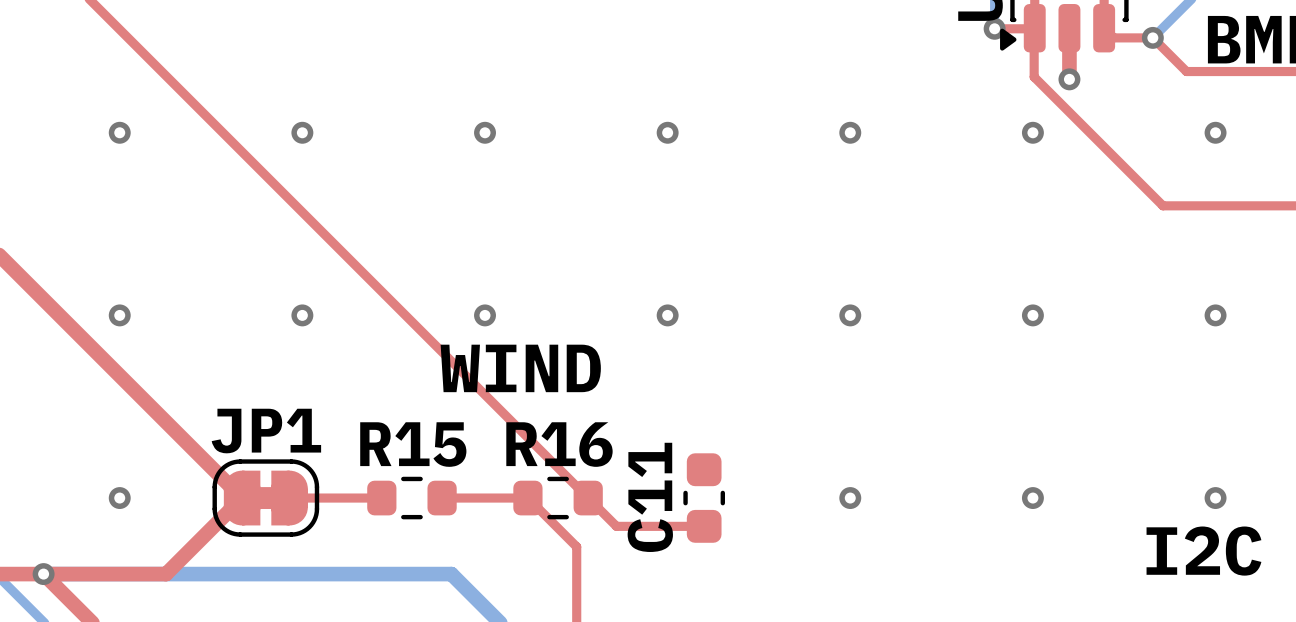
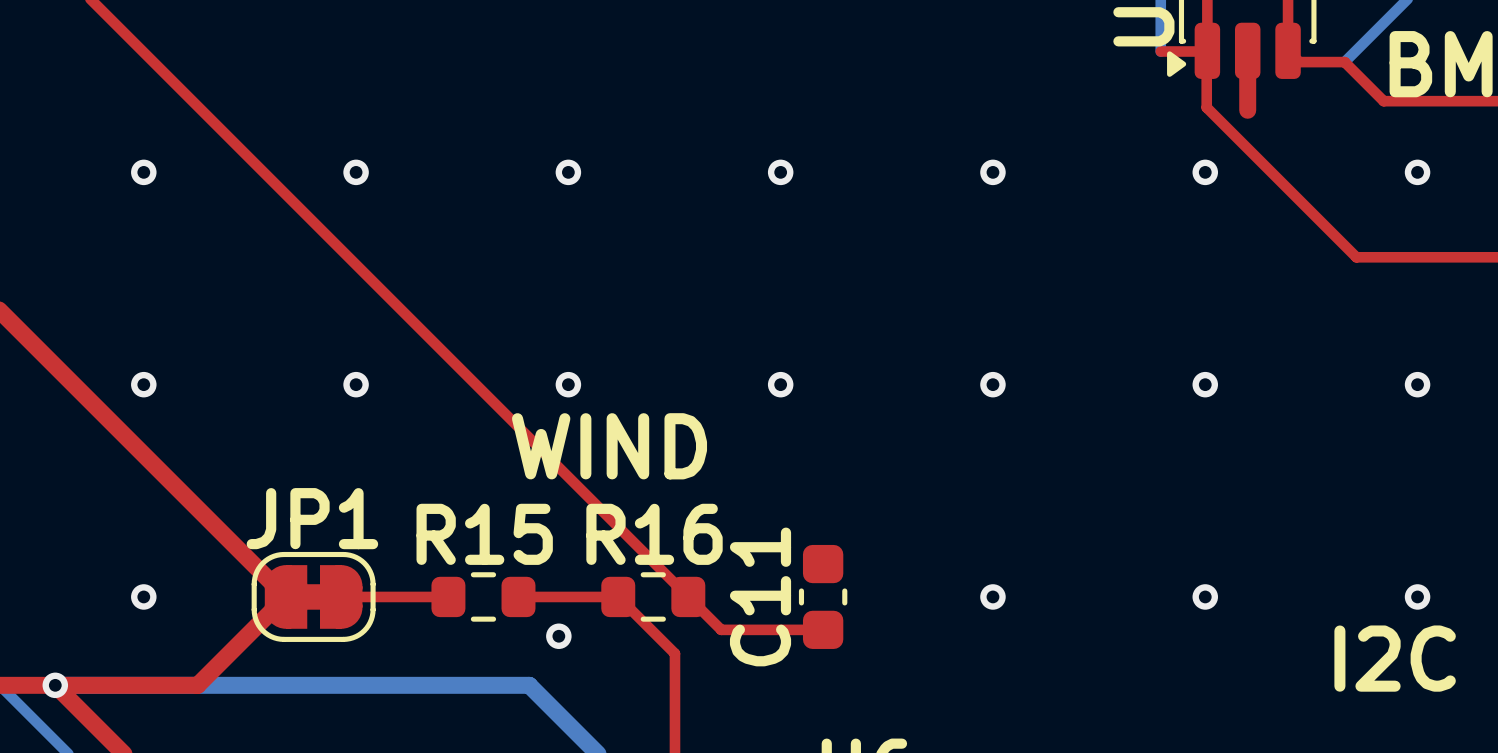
via: (994, 28) -> none
via: (1152, 37) -> none
via: (1069, 79) -> none
via: none -> (558, 636)

